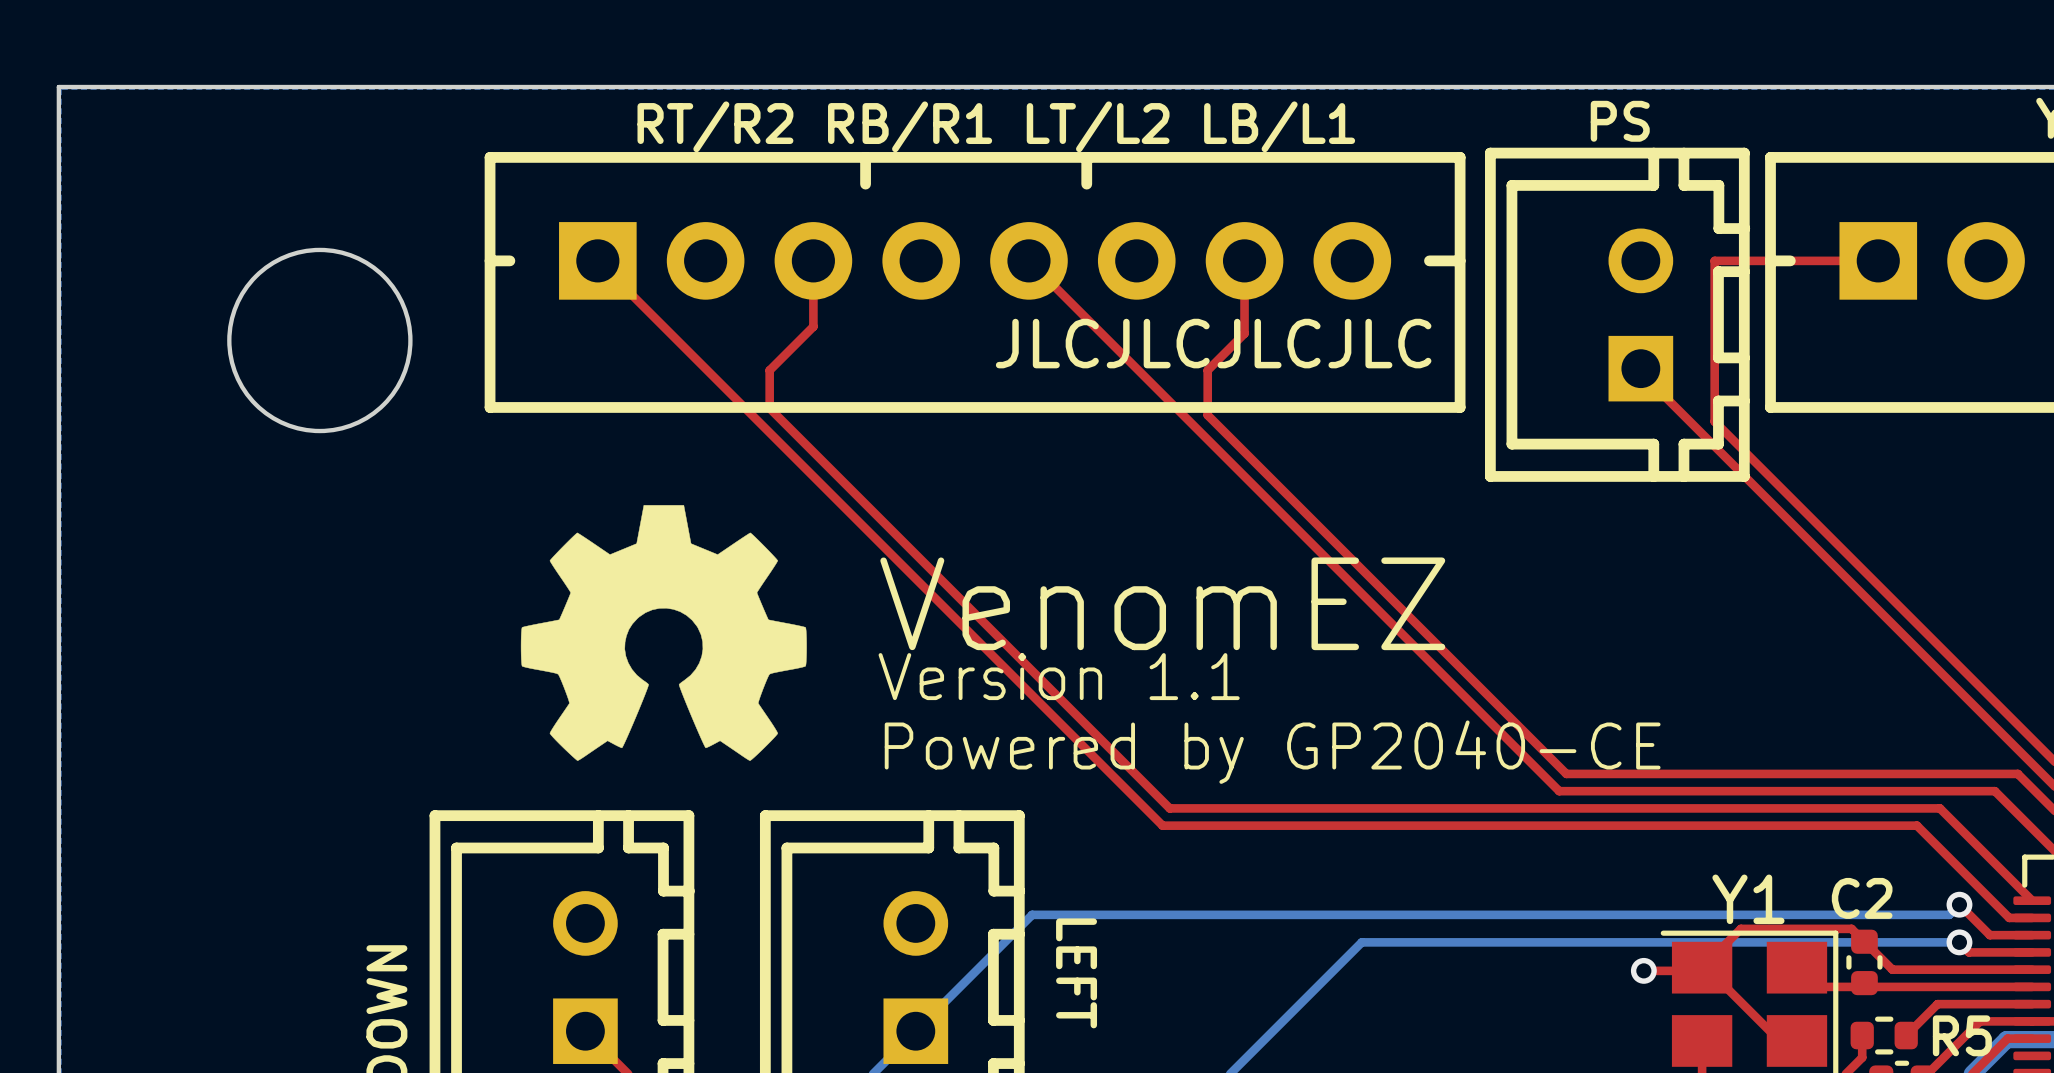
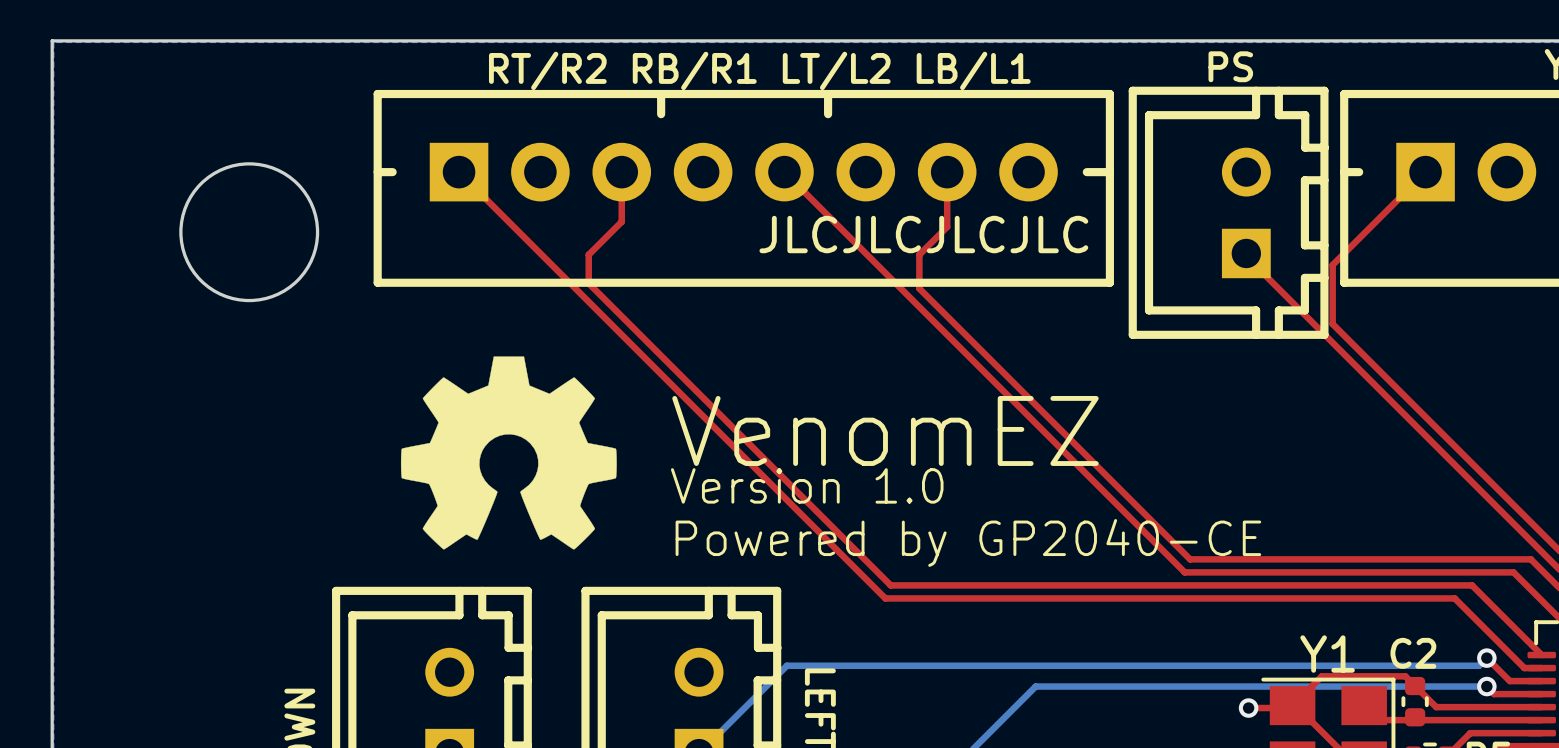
top track: (1878, 260) (1714, 260) (1714, 421) (1755, 462) -> (1425, 172) (1332, 264) (1332, 324)
text: Version 1.1 (1059, 676) -> Version 1.0 (807, 485)

